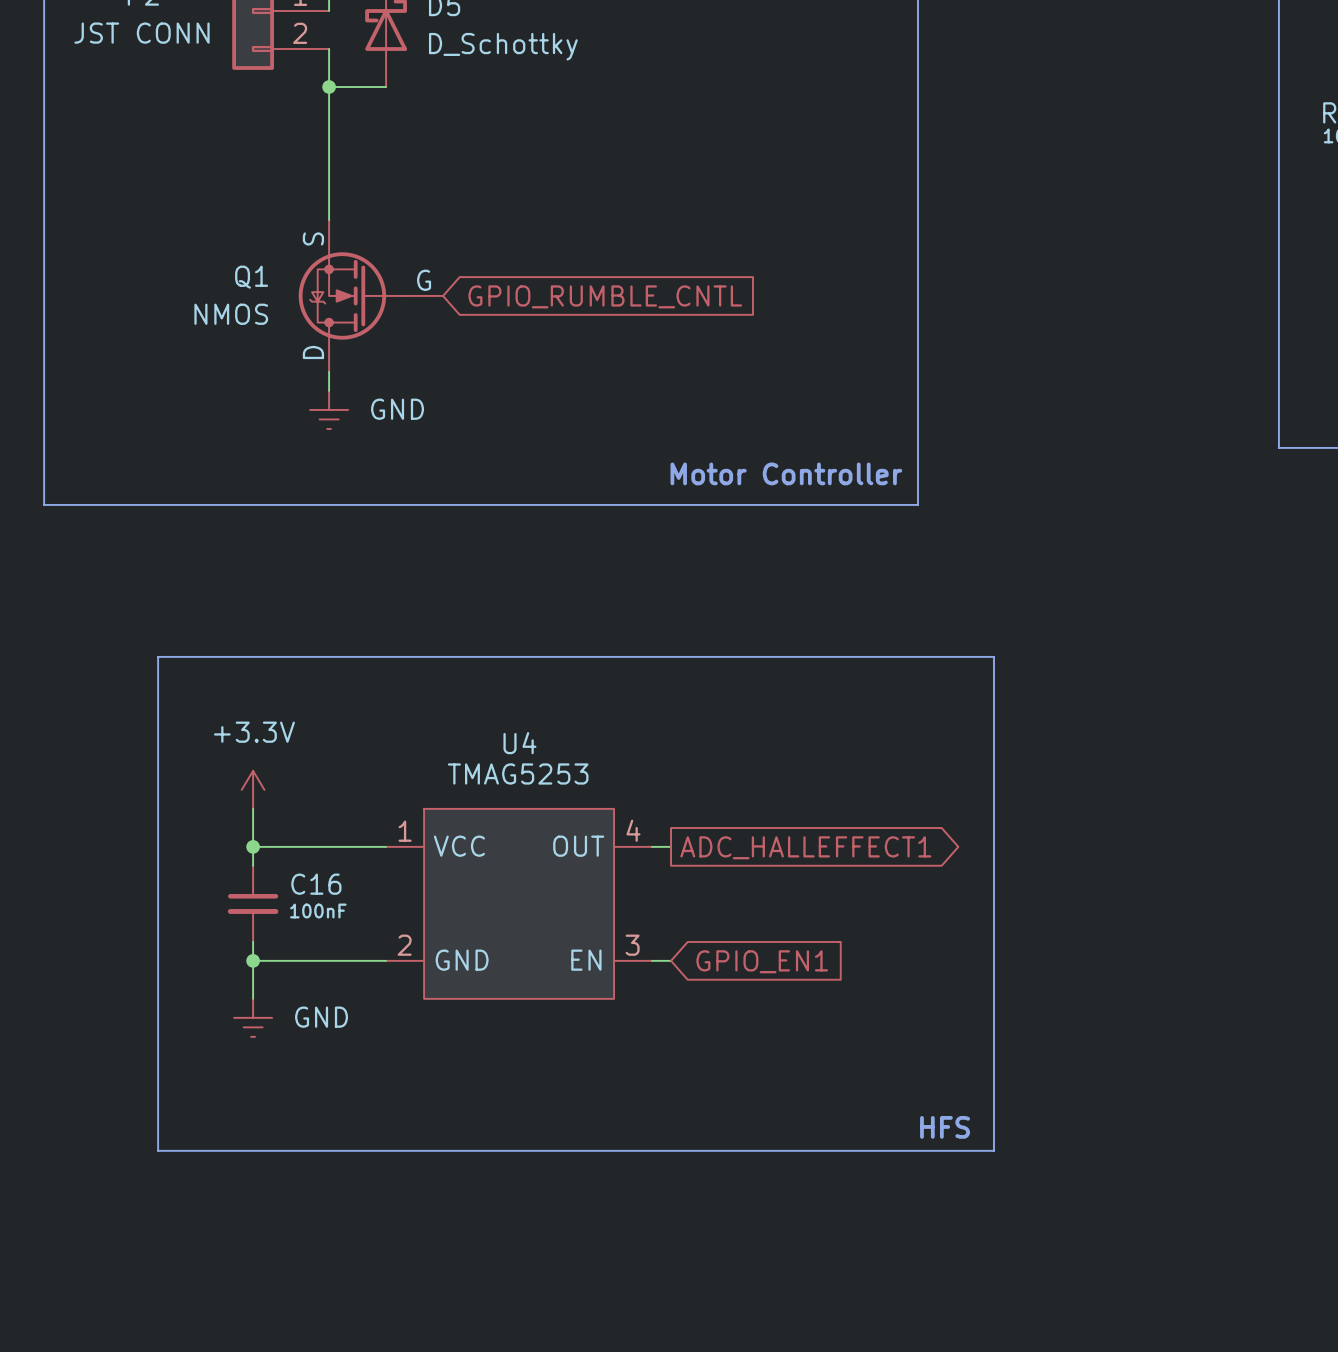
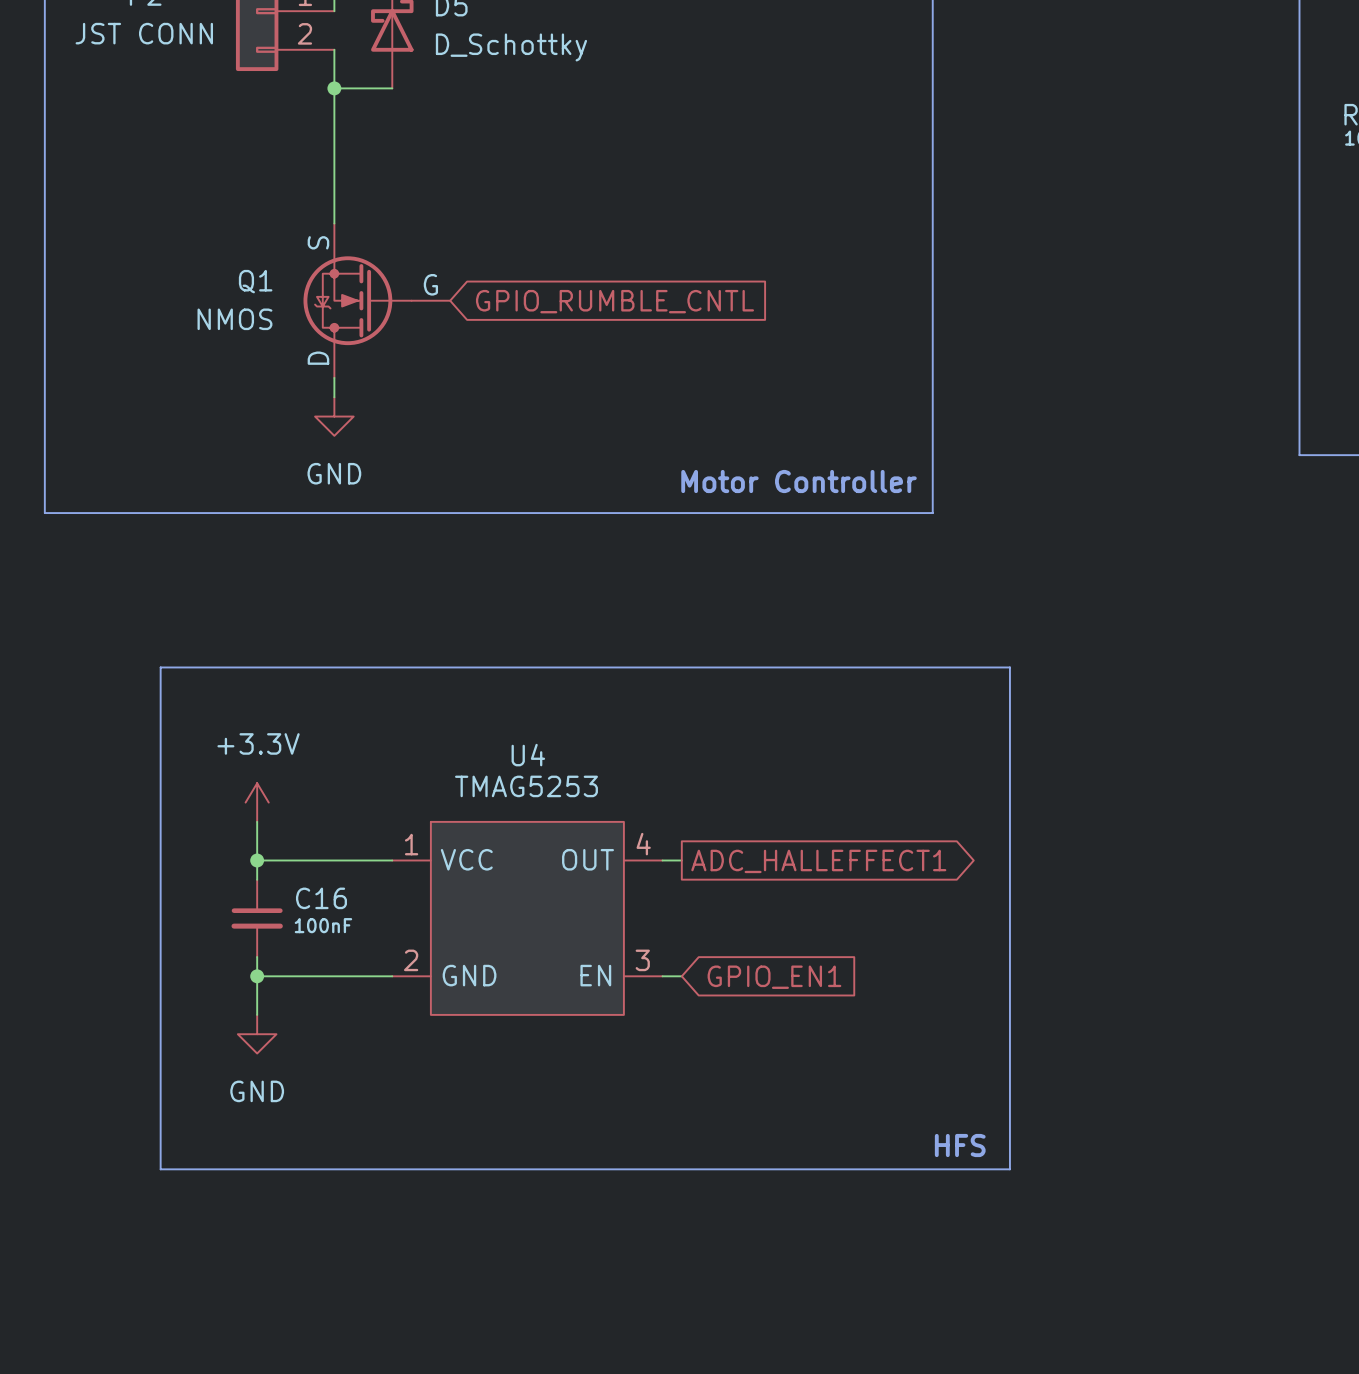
power symbol shape: [310, 390, 349, 429] -> [315, 397, 354, 436]
power symbol text position: GND (397, 409) -> GND (334, 473)
power symbol shape: [234, 998, 273, 1037] -> [237, 1014, 277, 1054]
power symbol text position: GND (321, 1017) -> GND (257, 1091)

